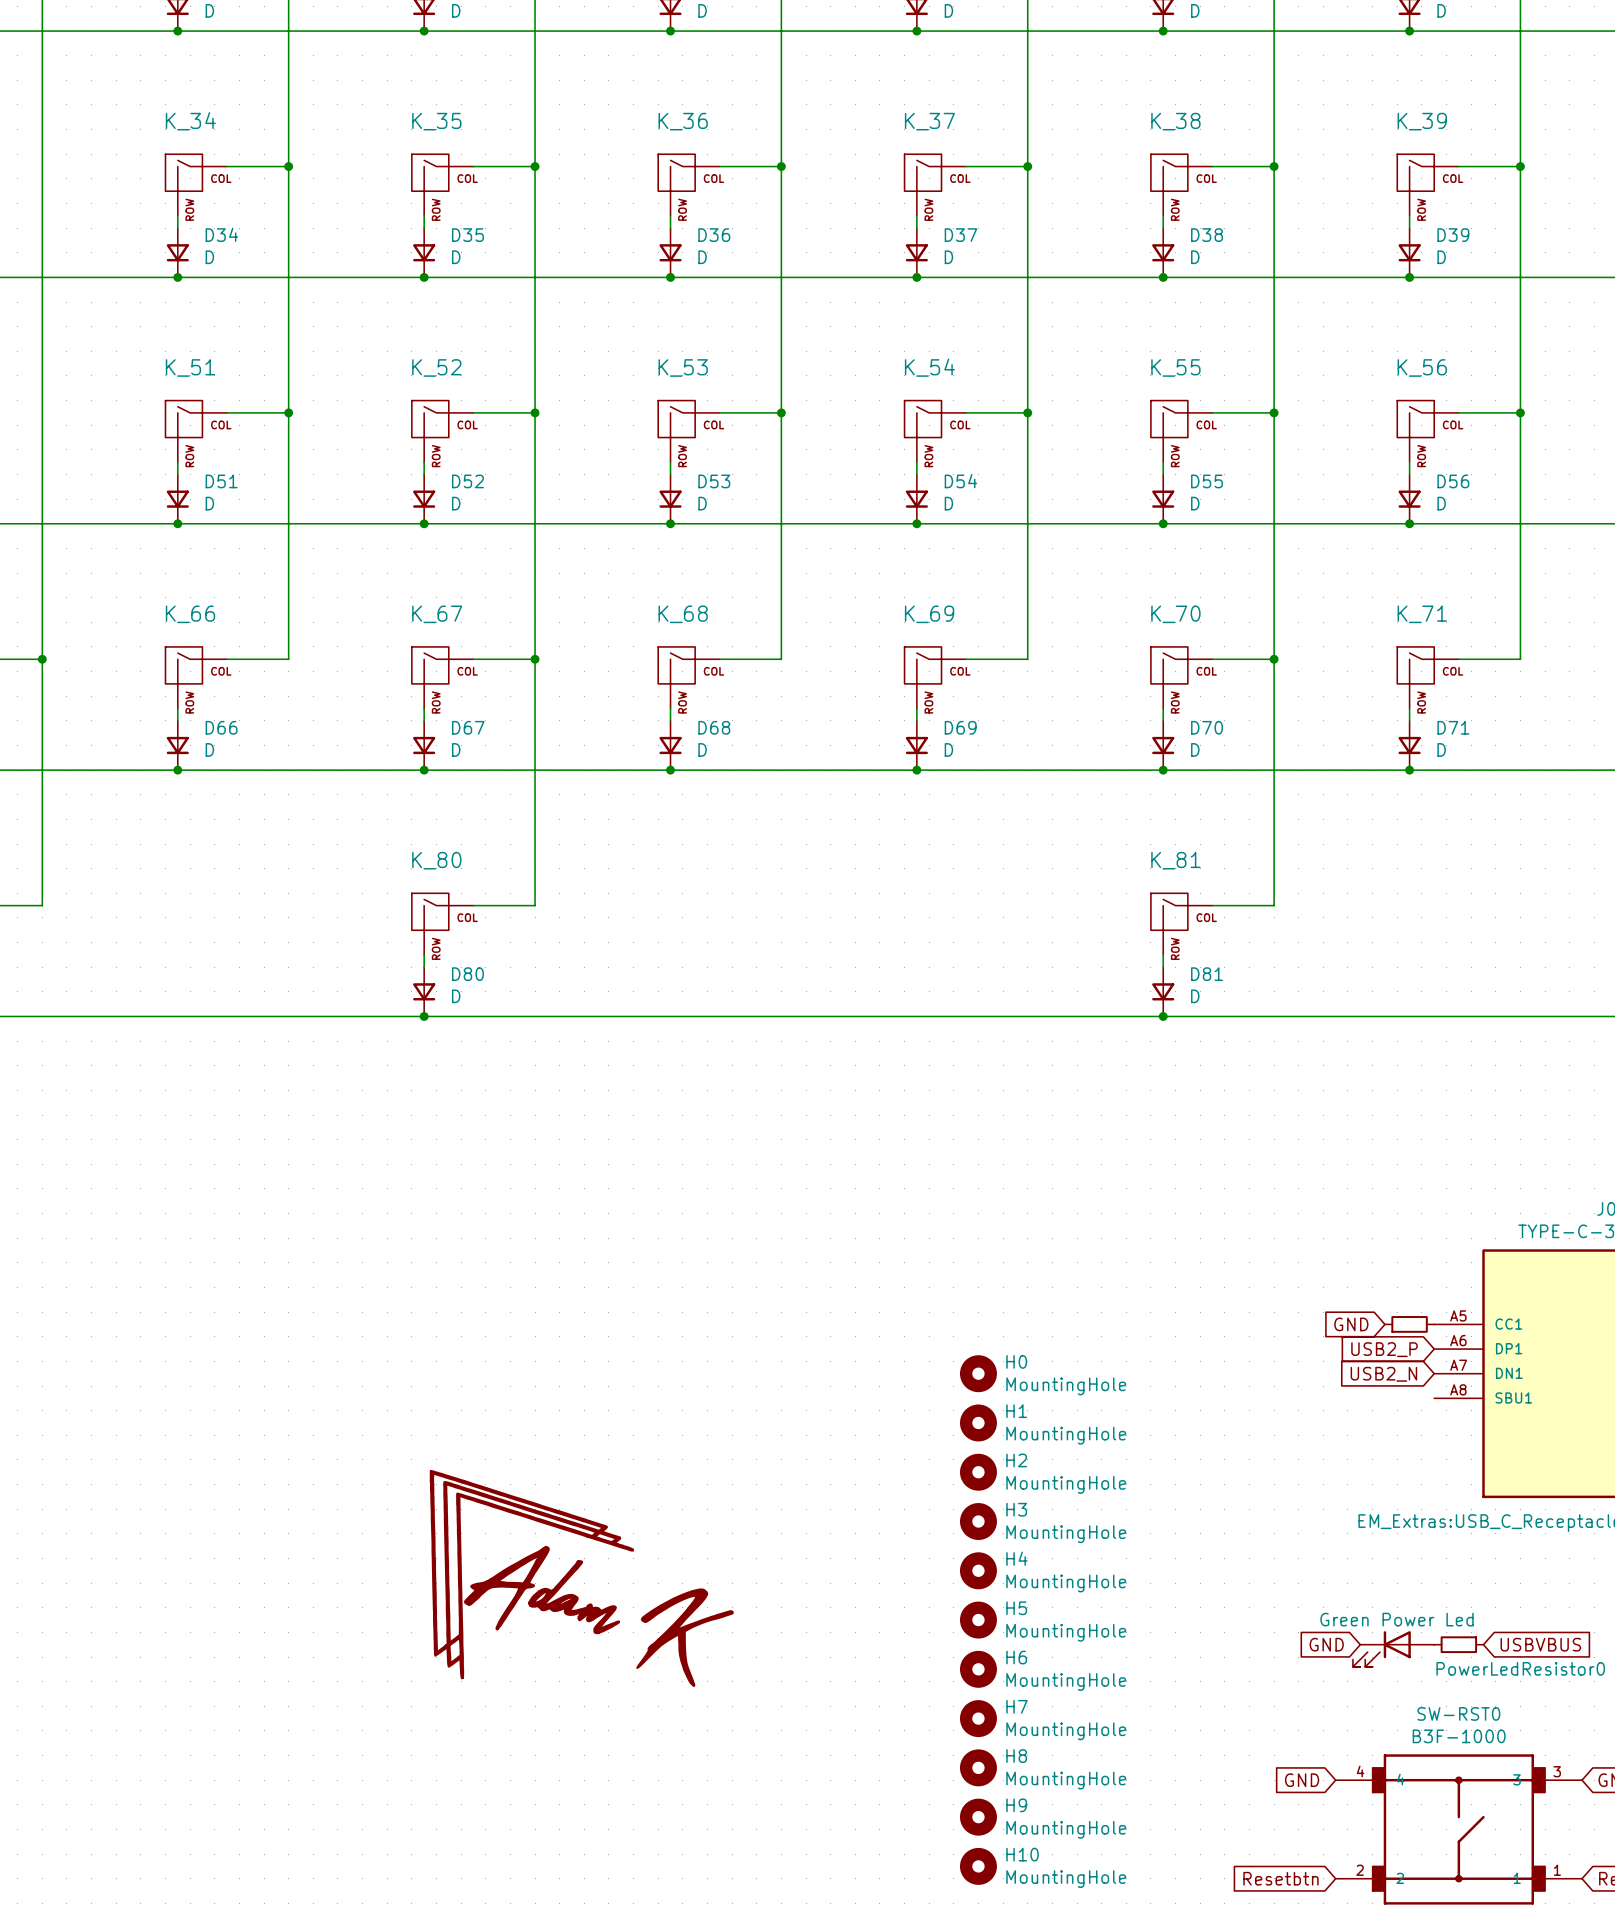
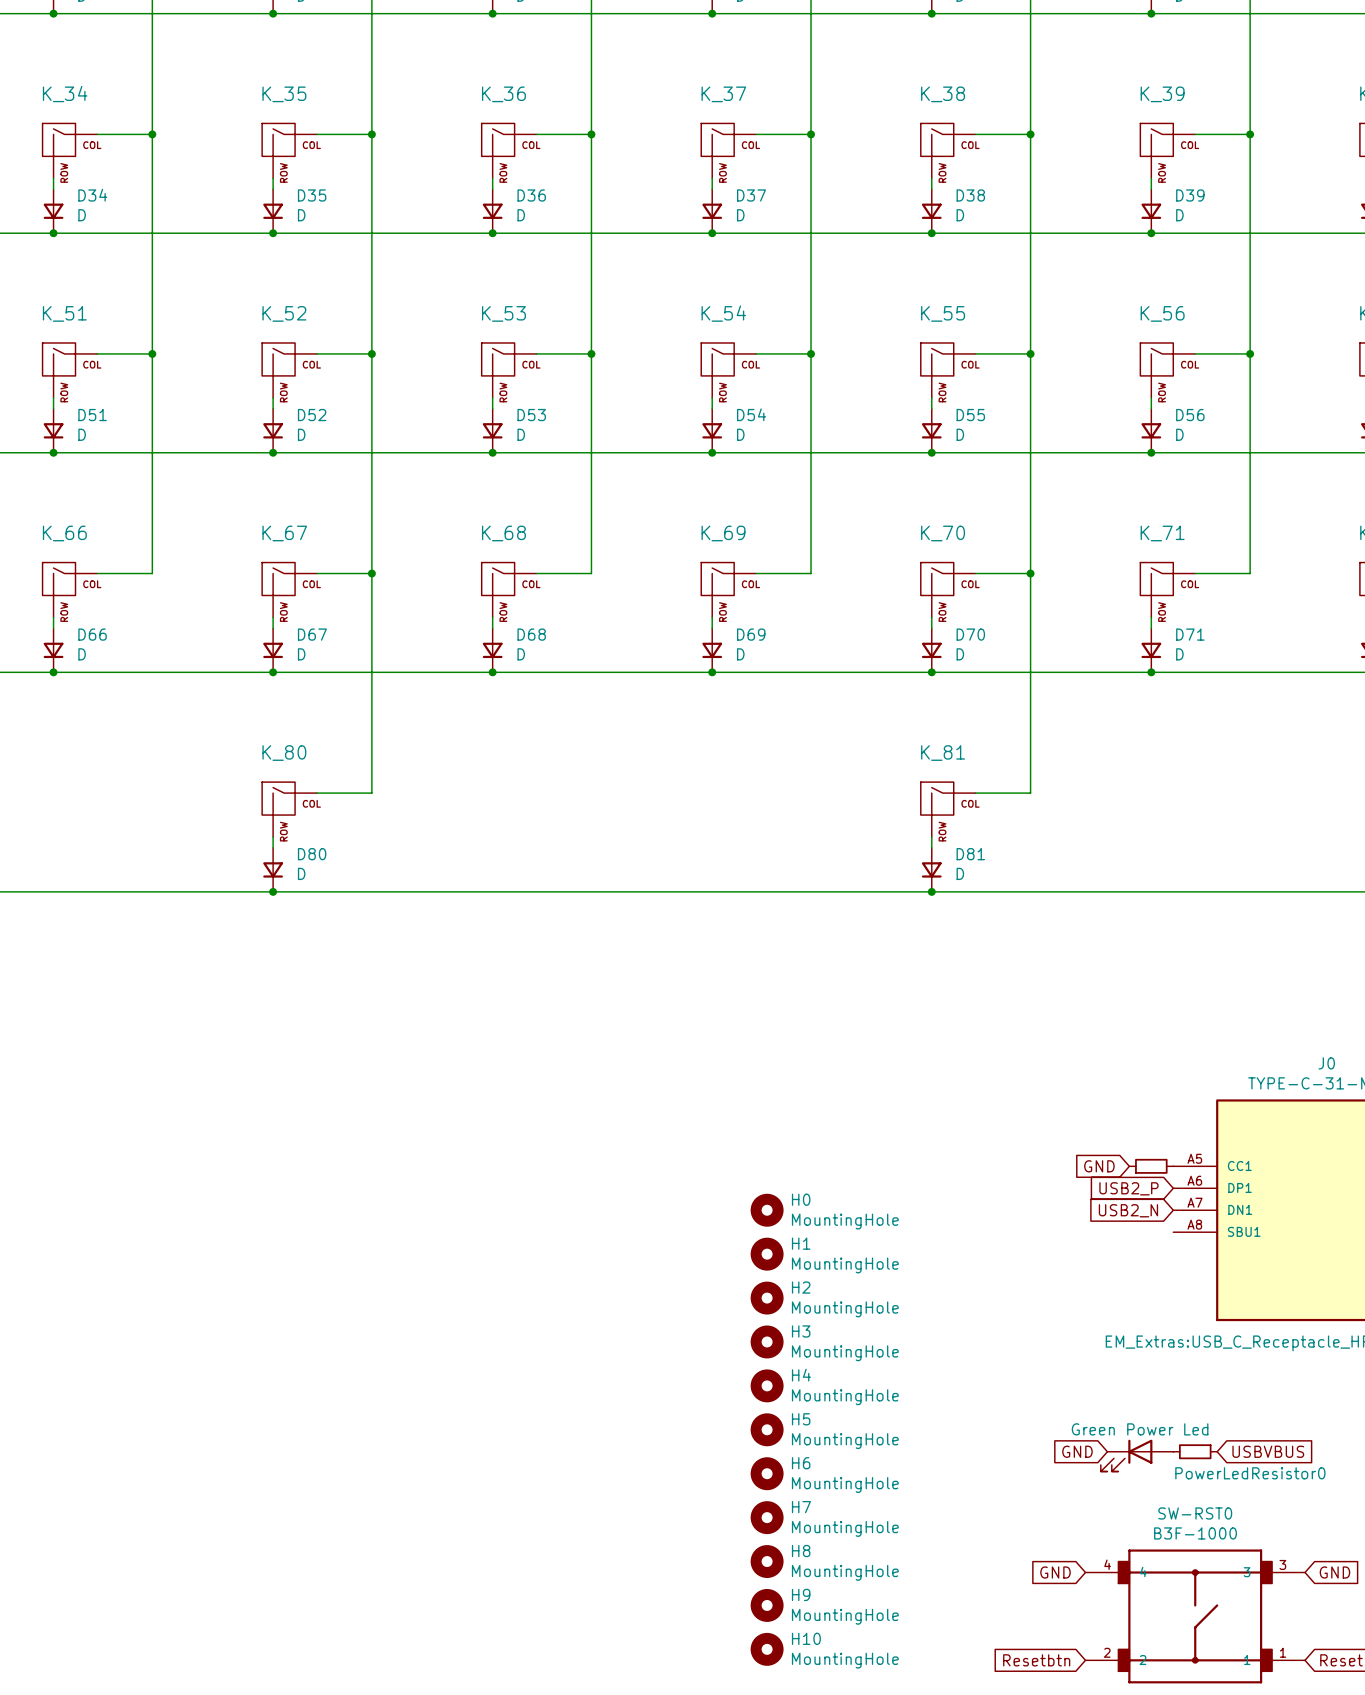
drawing: [430, 1470, 734, 1687] -> none

